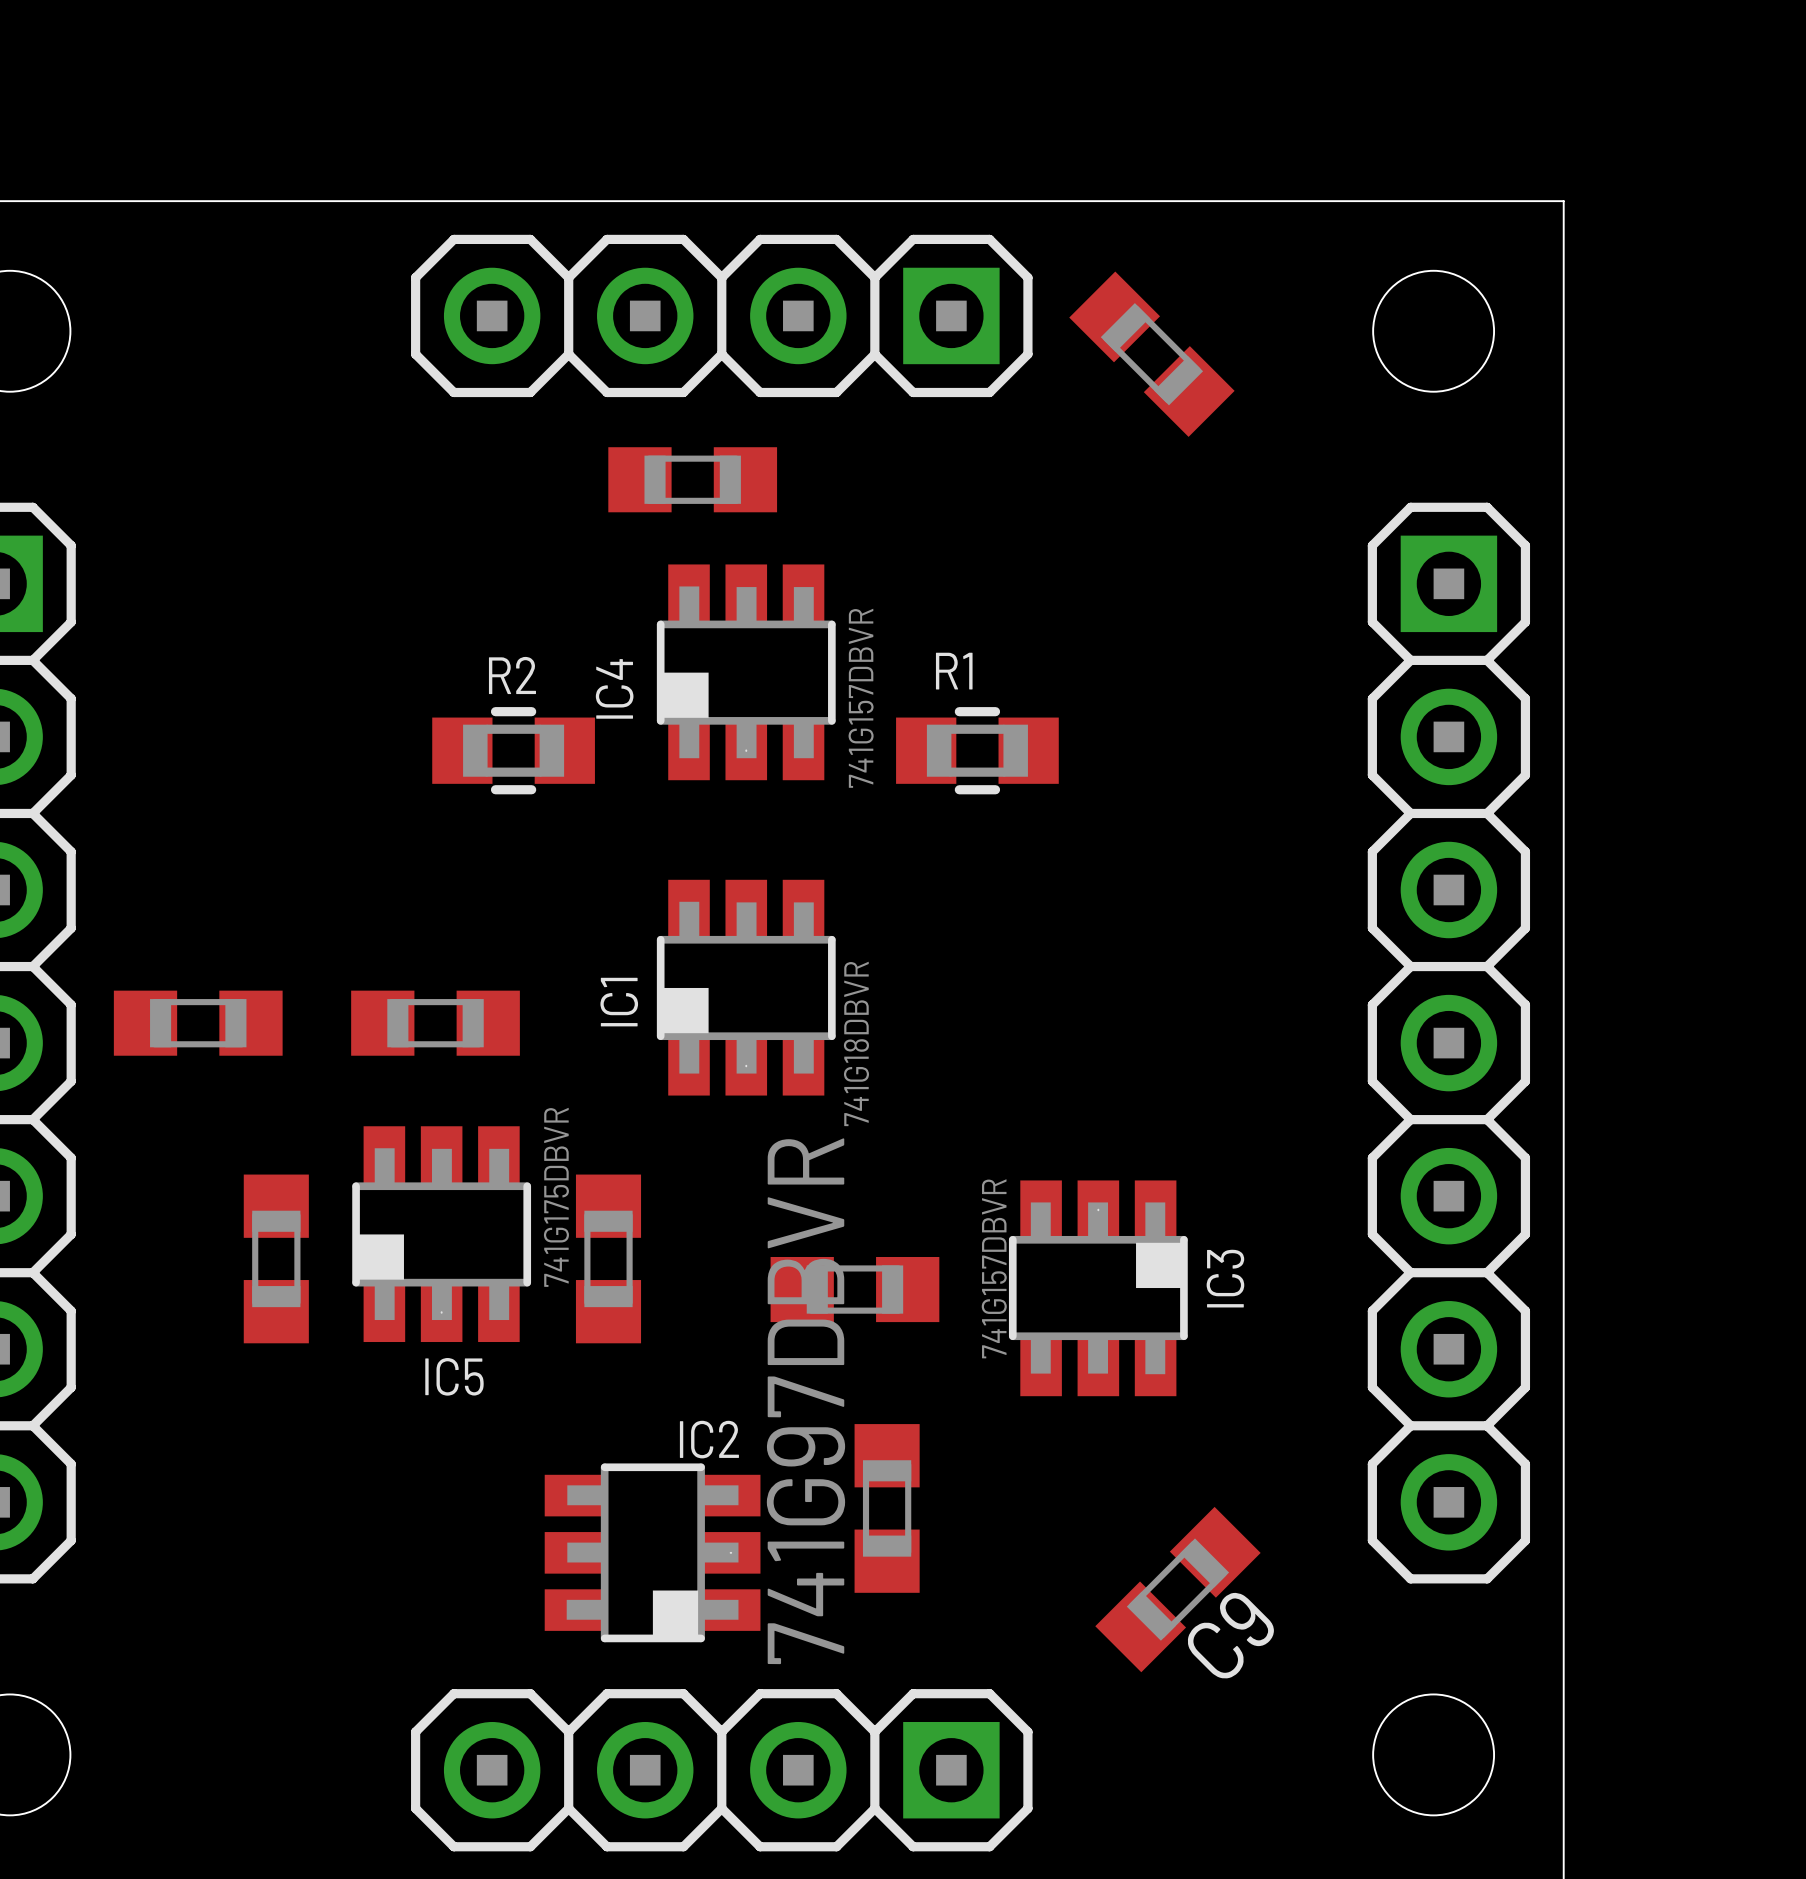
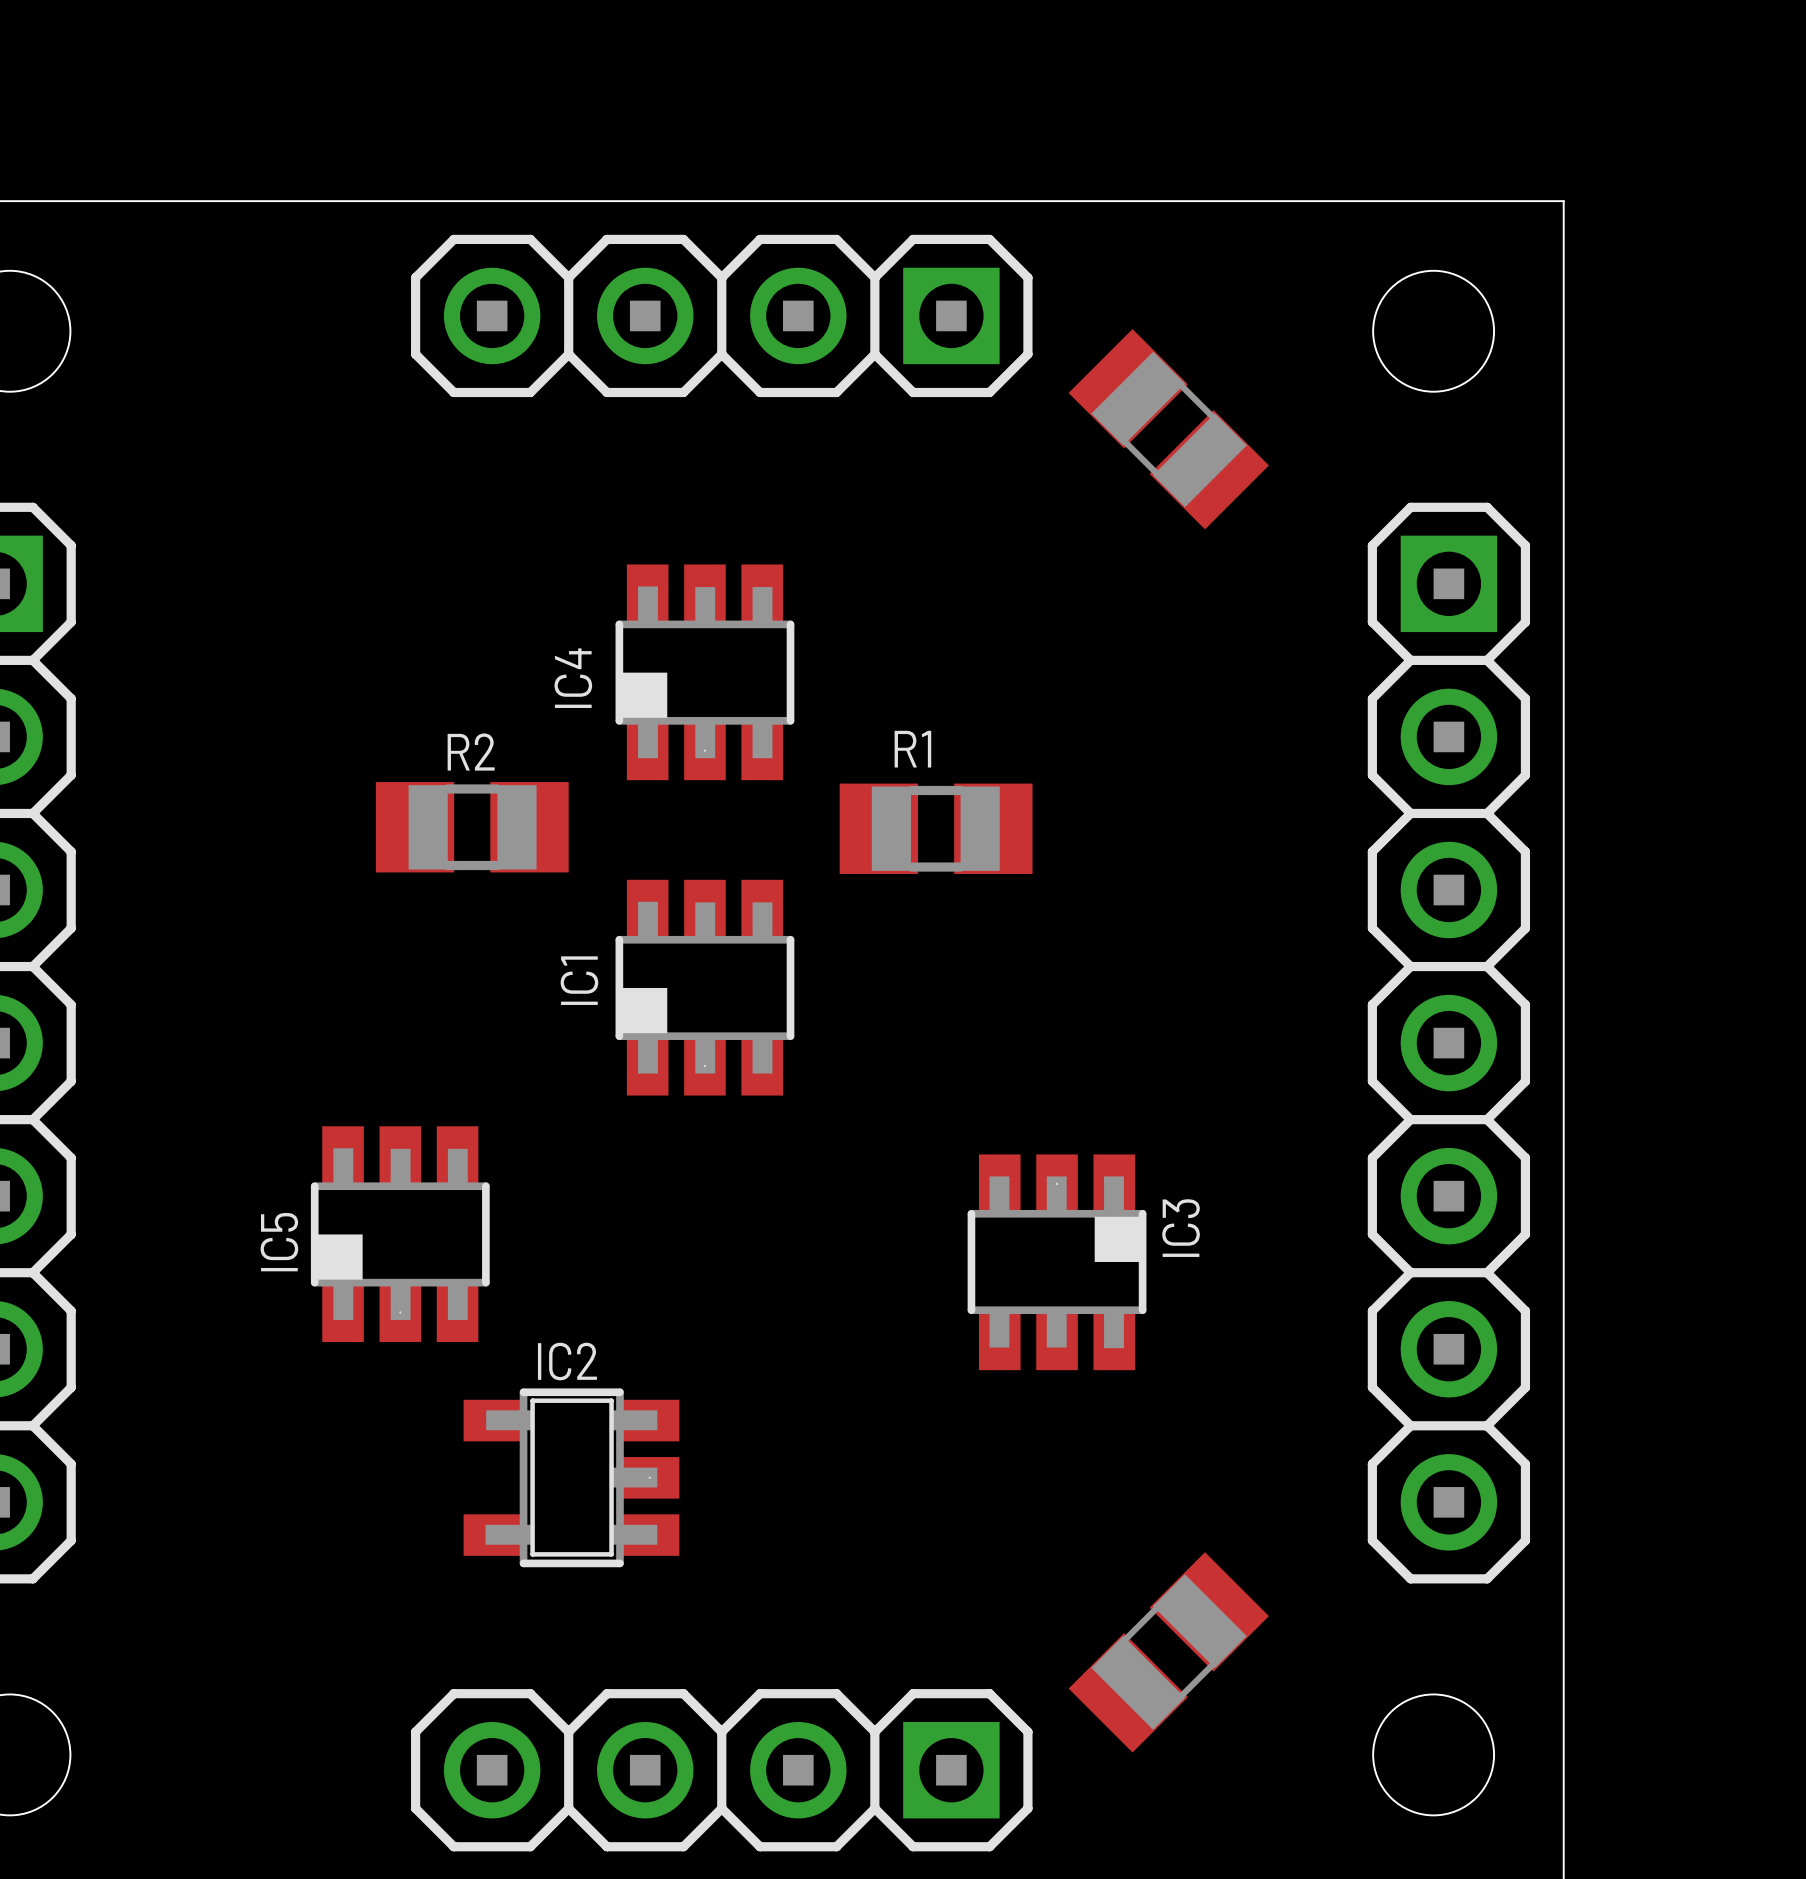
part: (1151, 354) -> none
part: none -> (1168, 429)
part: (692, 479) -> none
IC4 position: (746, 672) -> (704, 672)
IC4 name position: IC4 (614, 688) -> IC4 (573, 678)
IC4 value: 741G157DBVR (861, 698) -> none
R2 footprint: [432, 707, 595, 795] -> [375, 782, 569, 873]
R1 footprint: [896, 707, 1059, 795] -> [839, 783, 1033, 874]
IC1 position: (746, 987) -> (704, 987)
IC1 name position: IC1 (619, 1002) -> IC1 (579, 980)
part: (198, 1023) -> none
part: (435, 1023) -> none
IC1 value: 741G18DBVR (856, 1043) -> none
IC5 value: 741G175DBVR (556, 1197) -> none
IC5 position: (441, 1234) -> (400, 1234)
part: (276, 1258) -> none
part: (608, 1258) -> none
IC3 value: 741G157DBVR (994, 1268) -> none
IC3 name position: IC3 (1225, 1278) -> IC3 (1181, 1228)
IC3 position: (1098, 1288) -> (1057, 1262)
part: (854, 1289) -> none
IC5 name rotation: 0° (454, 1376) -> 90° counterclockwise (279, 1242)
IC5 name position: IC5 (454, 1376) -> IC5 (279, 1242)
IC2 value: 741G97DBVR (805, 1401) -> none
IC2 footprint: [544, 1463, 761, 1643] -> [463, 1388, 680, 1568]
part: (887, 1508) -> none
C9: (1177, 1589) -> none
part: none -> (1168, 1652)

